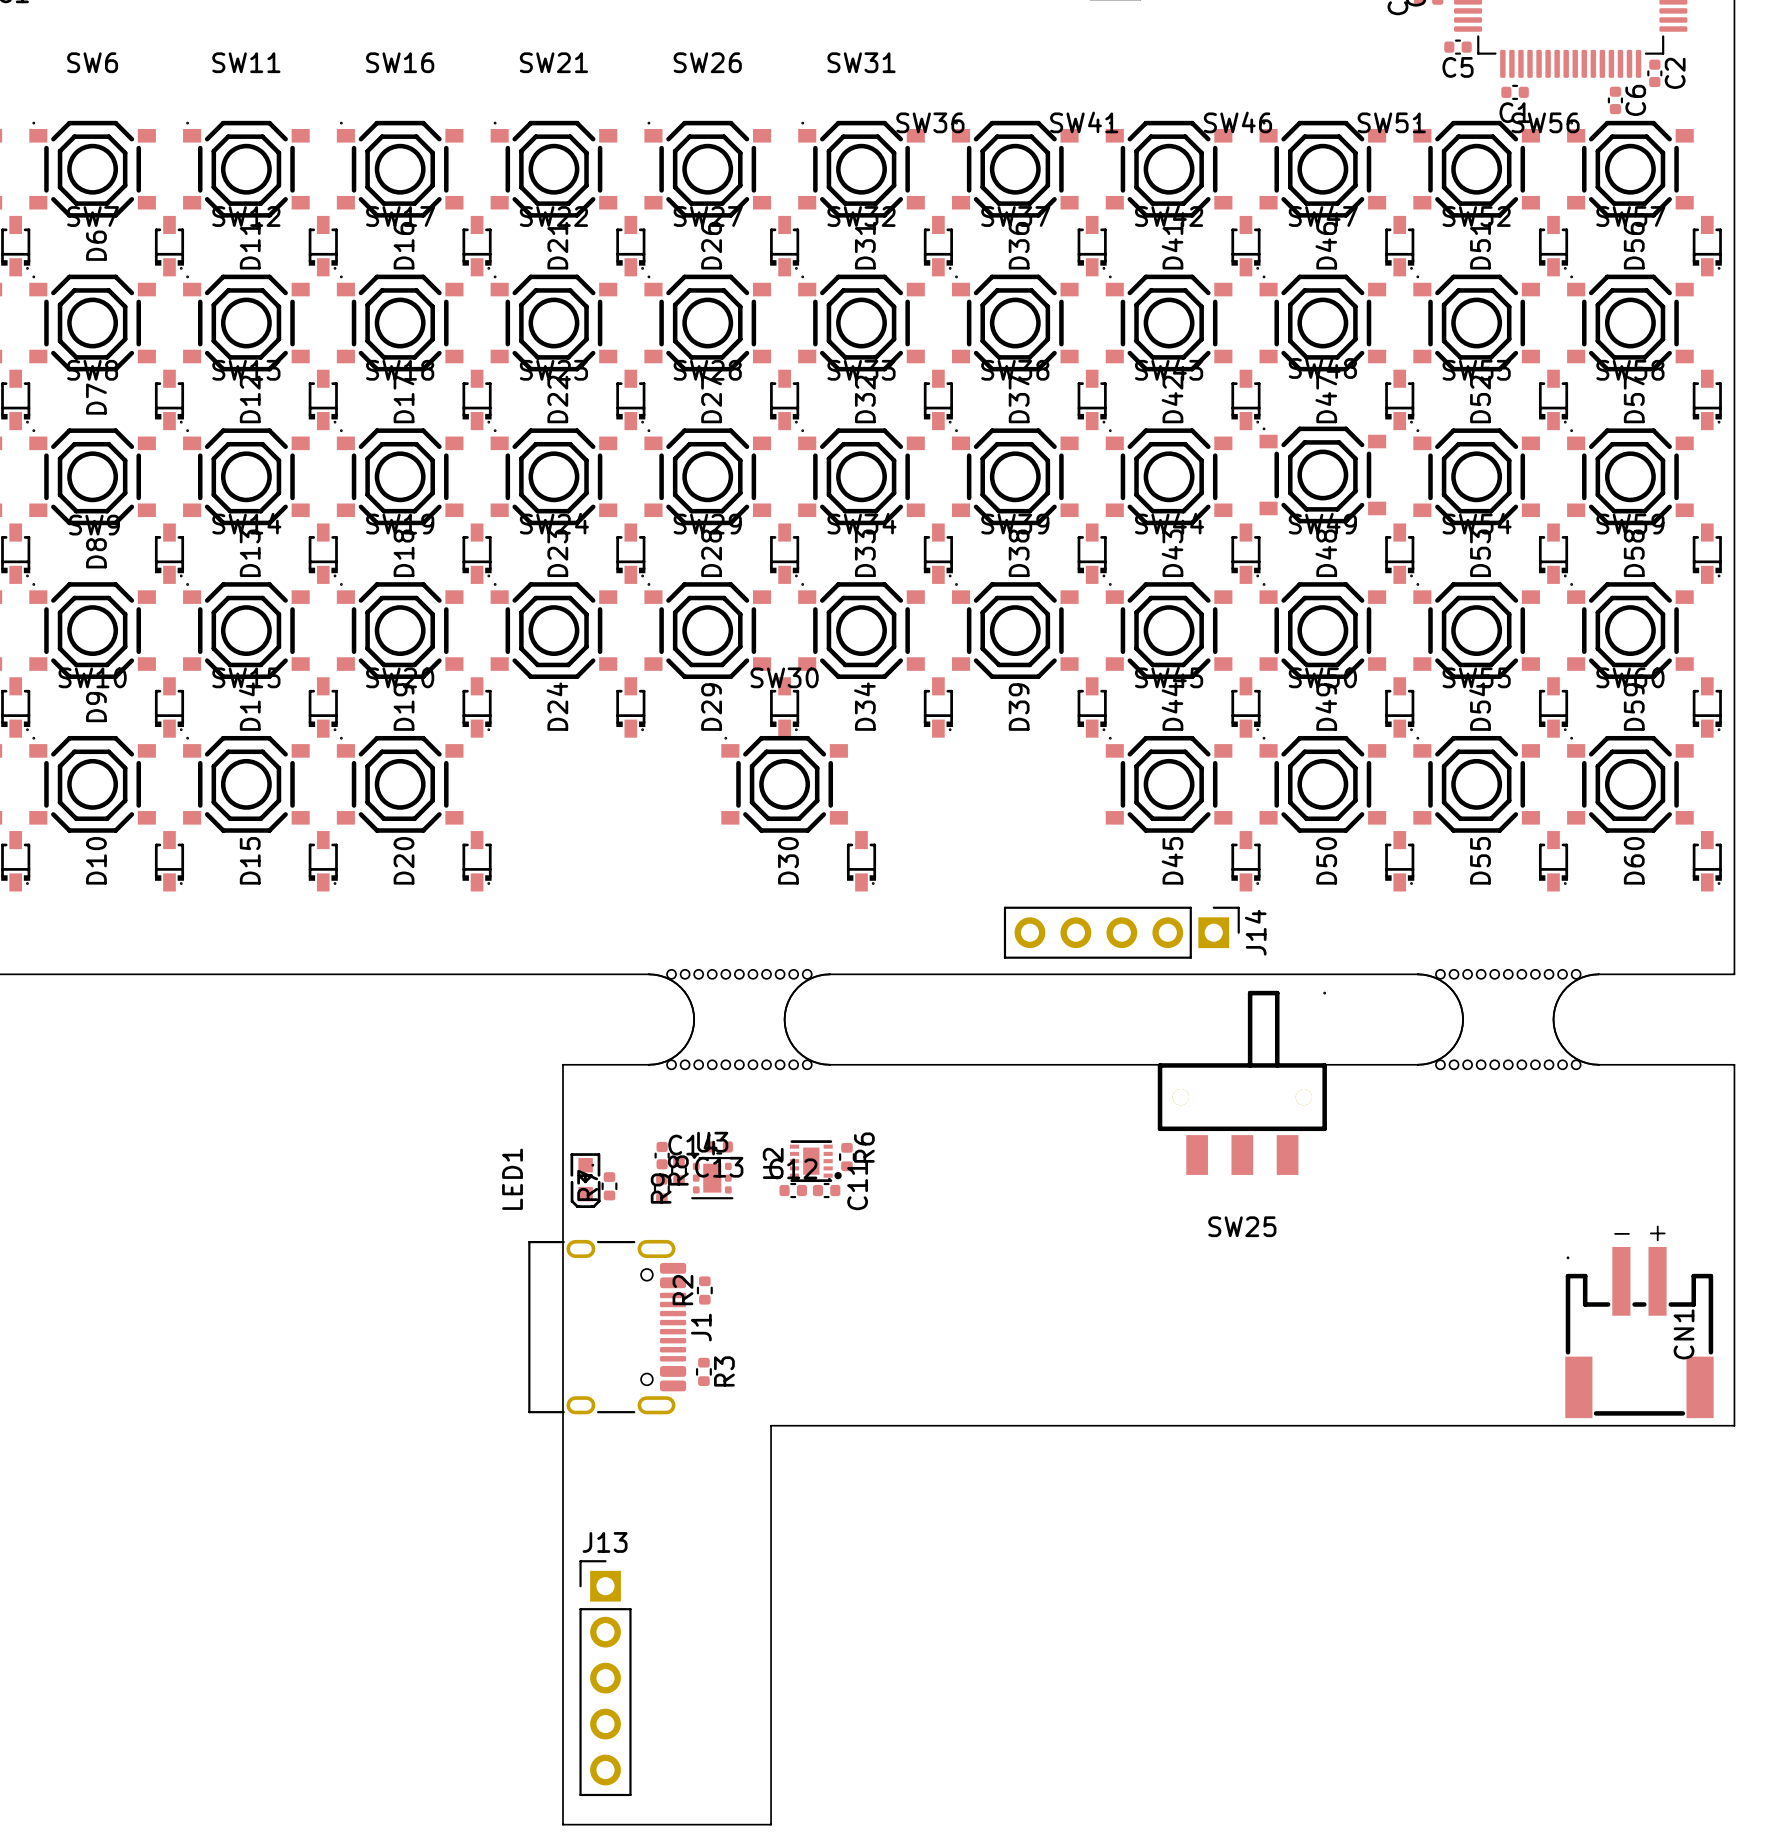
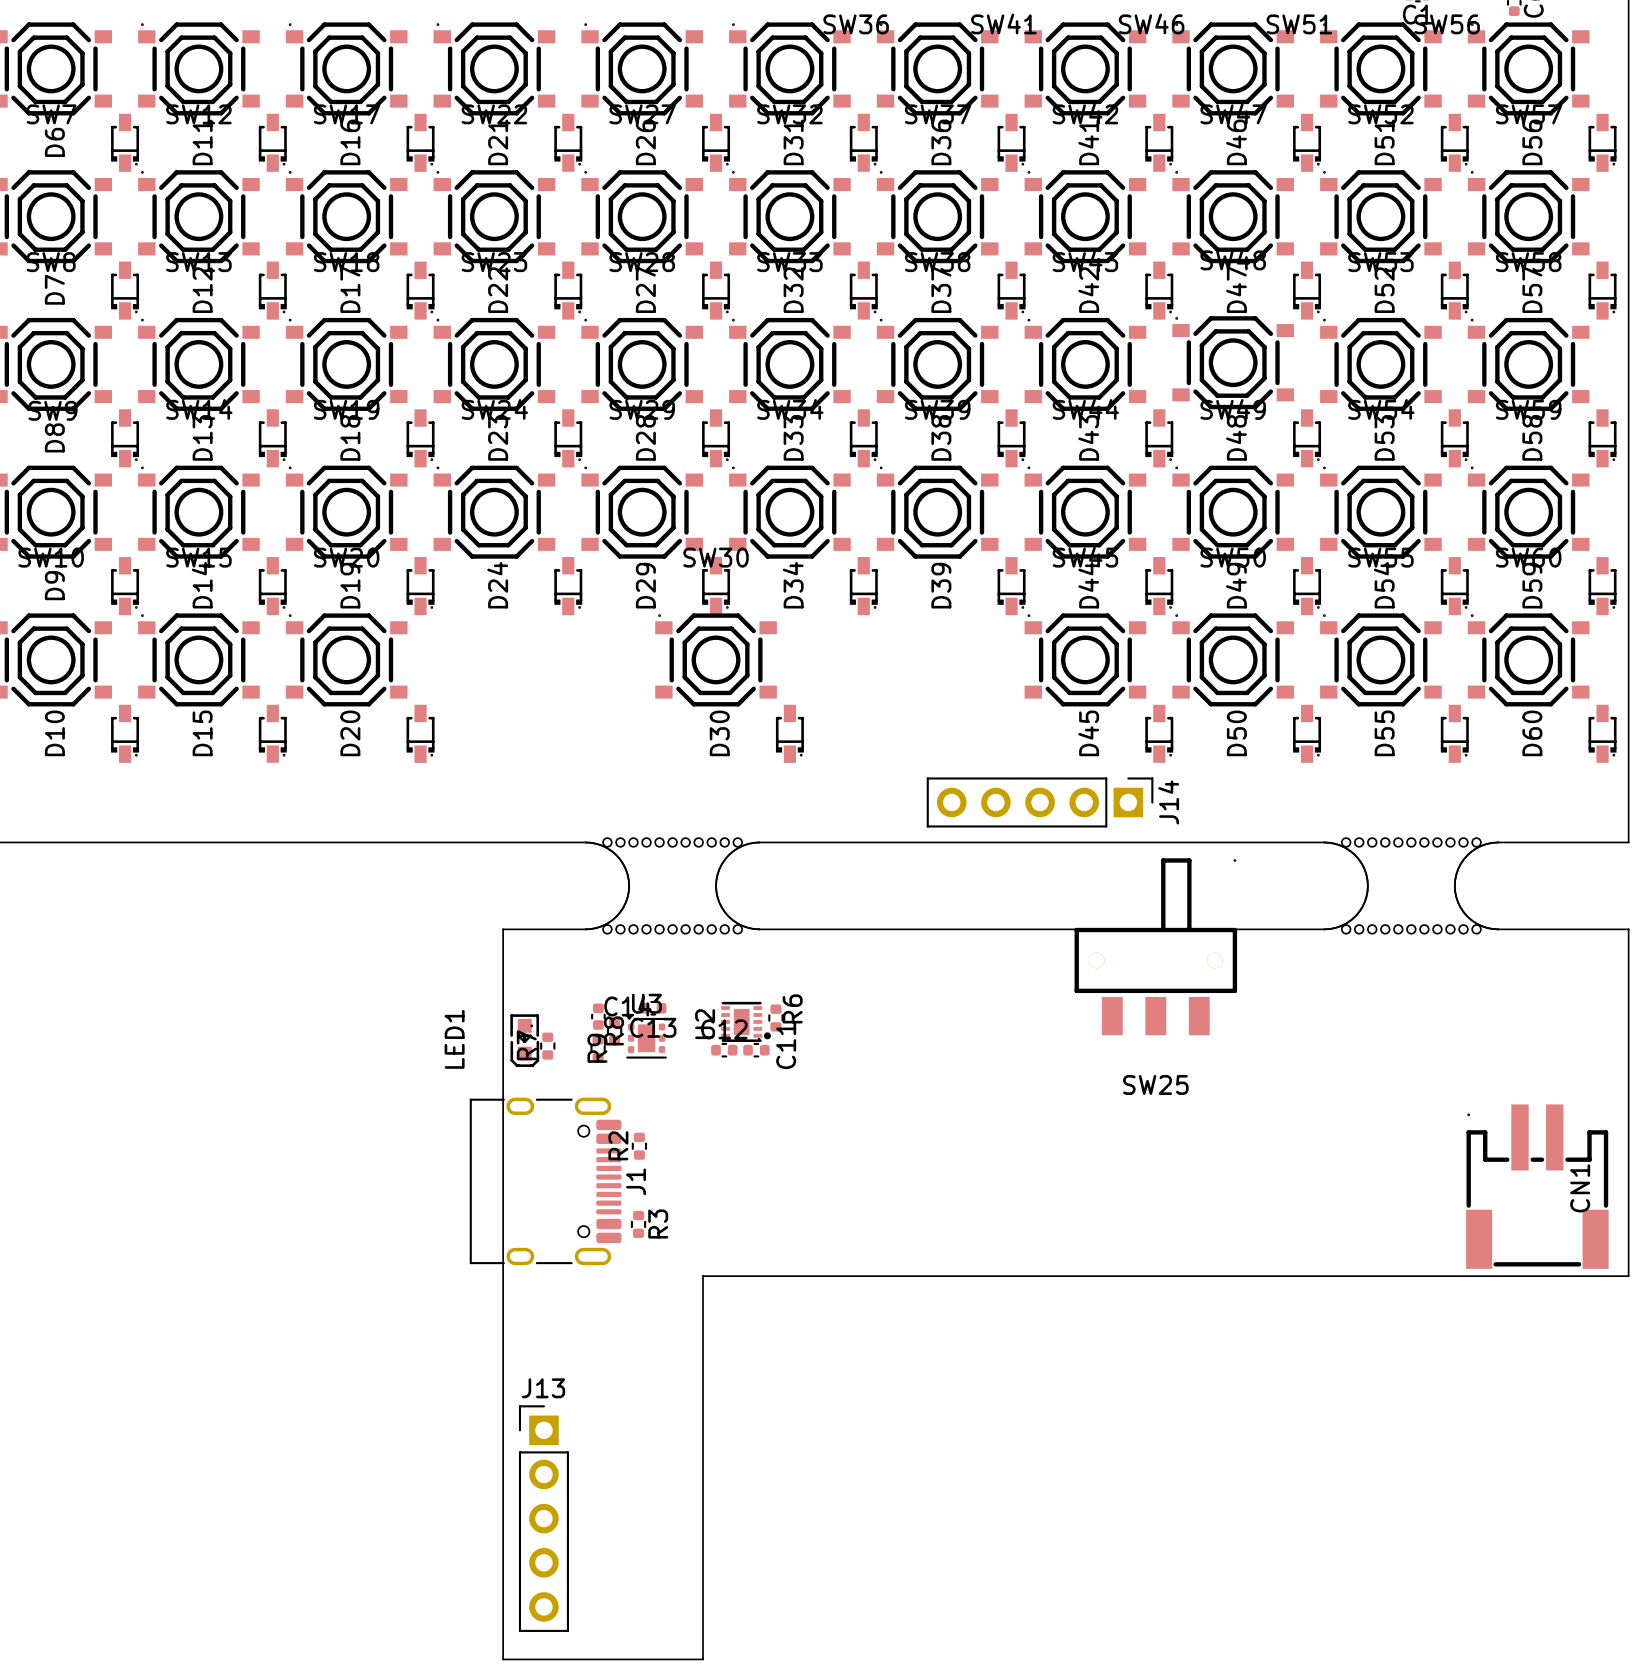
text: - (1622, 1233) -> none
text: + (1657, 1233) -> none

